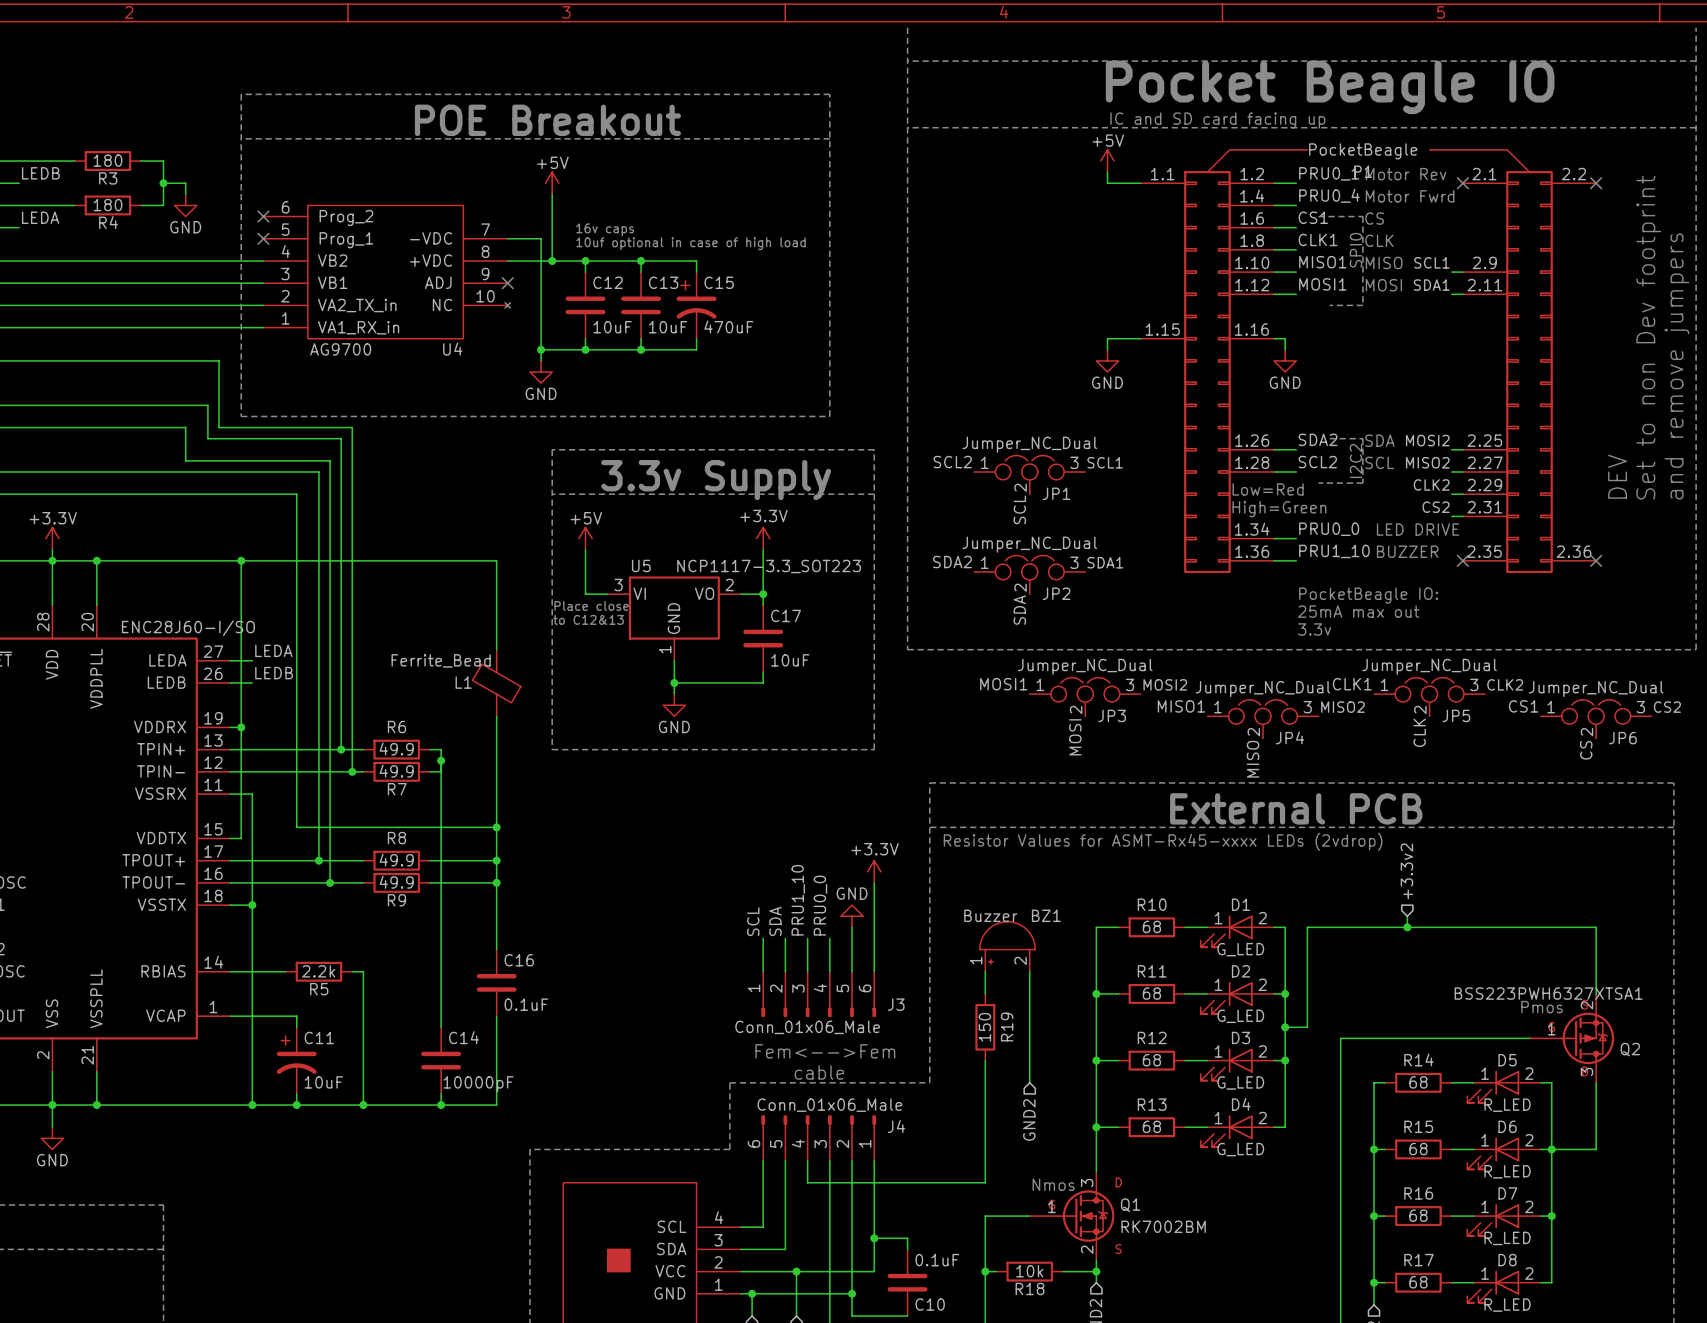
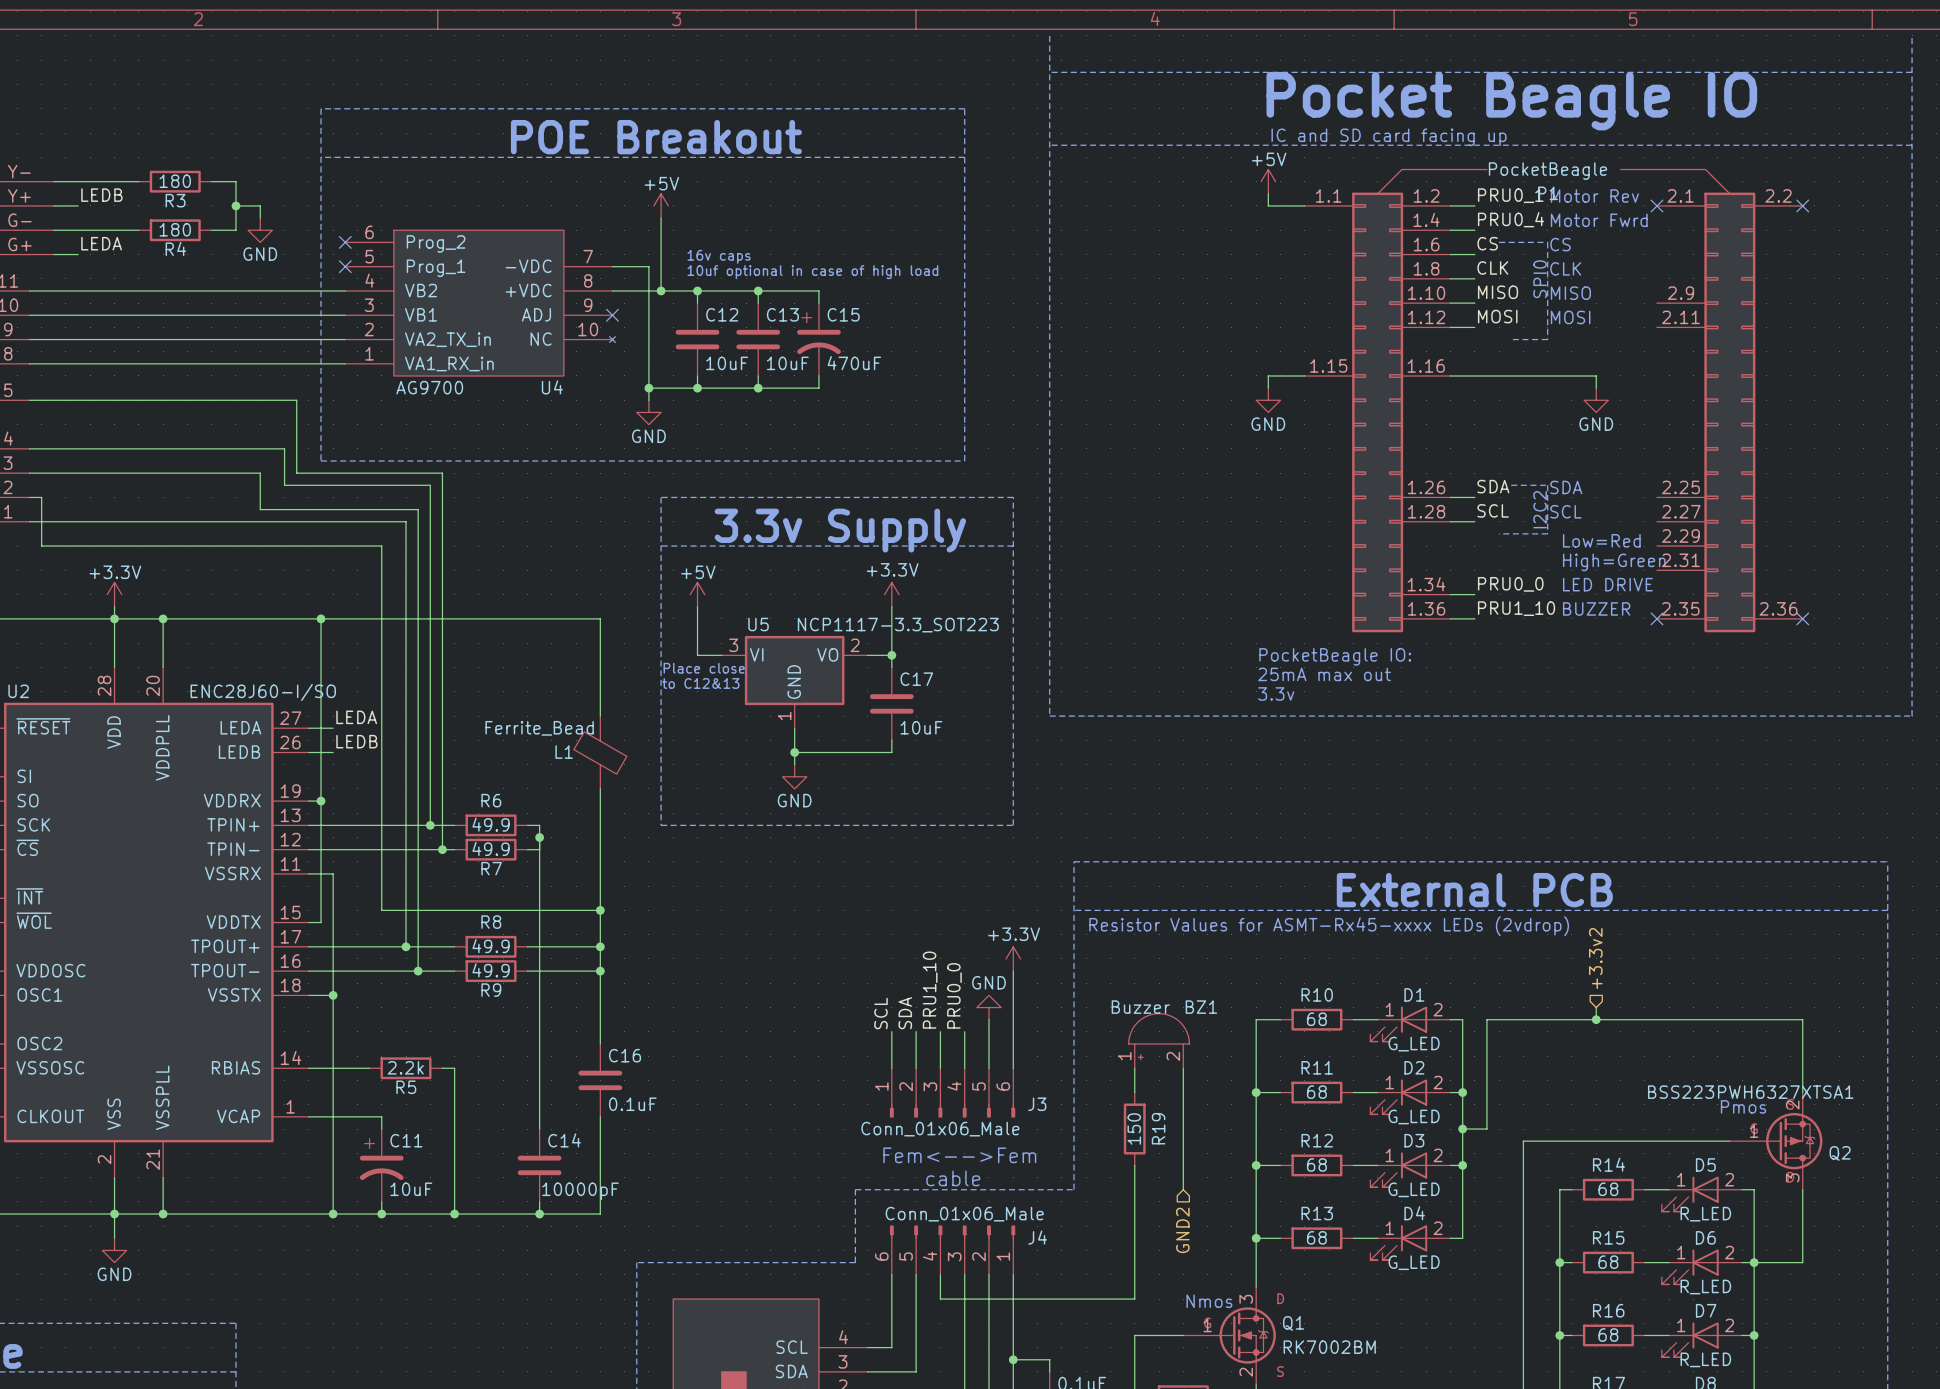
label: CS1 (1313, 217) -> CS (1487, 243)
label: CLK1 (1318, 239) -> CLK (1492, 267)
label: MISO1 (1322, 262) -> MISO (1498, 292)
label: SCL1 (1431, 262) -> none
wire: (1451, 272) (1462, 272) -> none
label: MOSI1 (1322, 284) -> MOSI (1497, 316)
label: SDA1 (1431, 285) -> none
wire: (1451, 294) (1462, 294) -> none
text: Set to non Dev footprint (1648, 337) -> none
wire: (1285, 338) (1285, 349) -> (1462, 375) (1596, 375) (1596, 388)
power symbol position: GND (1285, 360) -> GND (1596, 400)
text: and remove jumpers (1676, 366) -> none
label: SDA2 (1318, 439) -> SDA (1493, 486)
label: MOSI2 (1427, 440) -> none
wire: (1451, 449) (1462, 449) -> none
label: SCL2 (952, 462) -> none
label: SCL1 (1105, 462) -> none
label: SCL2 (1317, 462) -> SCL (1493, 510)
label: MISO2 (1427, 462) -> none
wire: (1451, 471) (1462, 471) -> none
JP1: Jumper_NC_Dual (1029, 474) -> none
text: DEV (1617, 476) -> none
label: CLK2 (1431, 484) -> none
text position: Low=Red (1268, 489) -> Low=Red (1601, 540)
wire: (1451, 494) (1462, 494) -> none
label: CS2 (1436, 507) -> none
label: SCL (1019, 509) -> none
text position: High=Green (1279, 509) -> High=Green (1614, 562)
wire: (1451, 516) (1462, 516) -> none
label: SDA2 (952, 562) -> none
label: SDA1 (1105, 562) -> none
JP2: Jumper_NC_Dual (1029, 574) -> none
text position: PocketBeagle IO: (1368, 595) -> PocketBeagle IO: (1335, 656)
label: SDA (1019, 610) -> none
text position: 25mA max out (1358, 611) -> 25mA max out (1324, 674)
text position: 3.3v (1314, 629) -> 3.3v (1276, 693)
label: MOSI1 (1003, 684) -> none
label: MOSI2 (1165, 684) -> none
label: CLK1 (1352, 684) -> none
label: CLK2 (1505, 684) -> none
JP3: Jumper_NC_Dual (1085, 696) -> none
JP5: Jumper_NC_Dual (1429, 696) -> none
label: MISO1 (1181, 706) -> none
label: CS1 (1523, 706) -> none
label: MISO2 (1342, 707) -> none
label: CS2 (1667, 707) -> none
JP4: Jumper_NC_Dual (1262, 719) -> none
JP6: Jumper_NC_Dual (1596, 719) -> none
label: CLK (1419, 732) -> none
label: MOSI (1075, 737) -> none
label: CS (1586, 750) -> none
label: MISO (1253, 759) -> none

